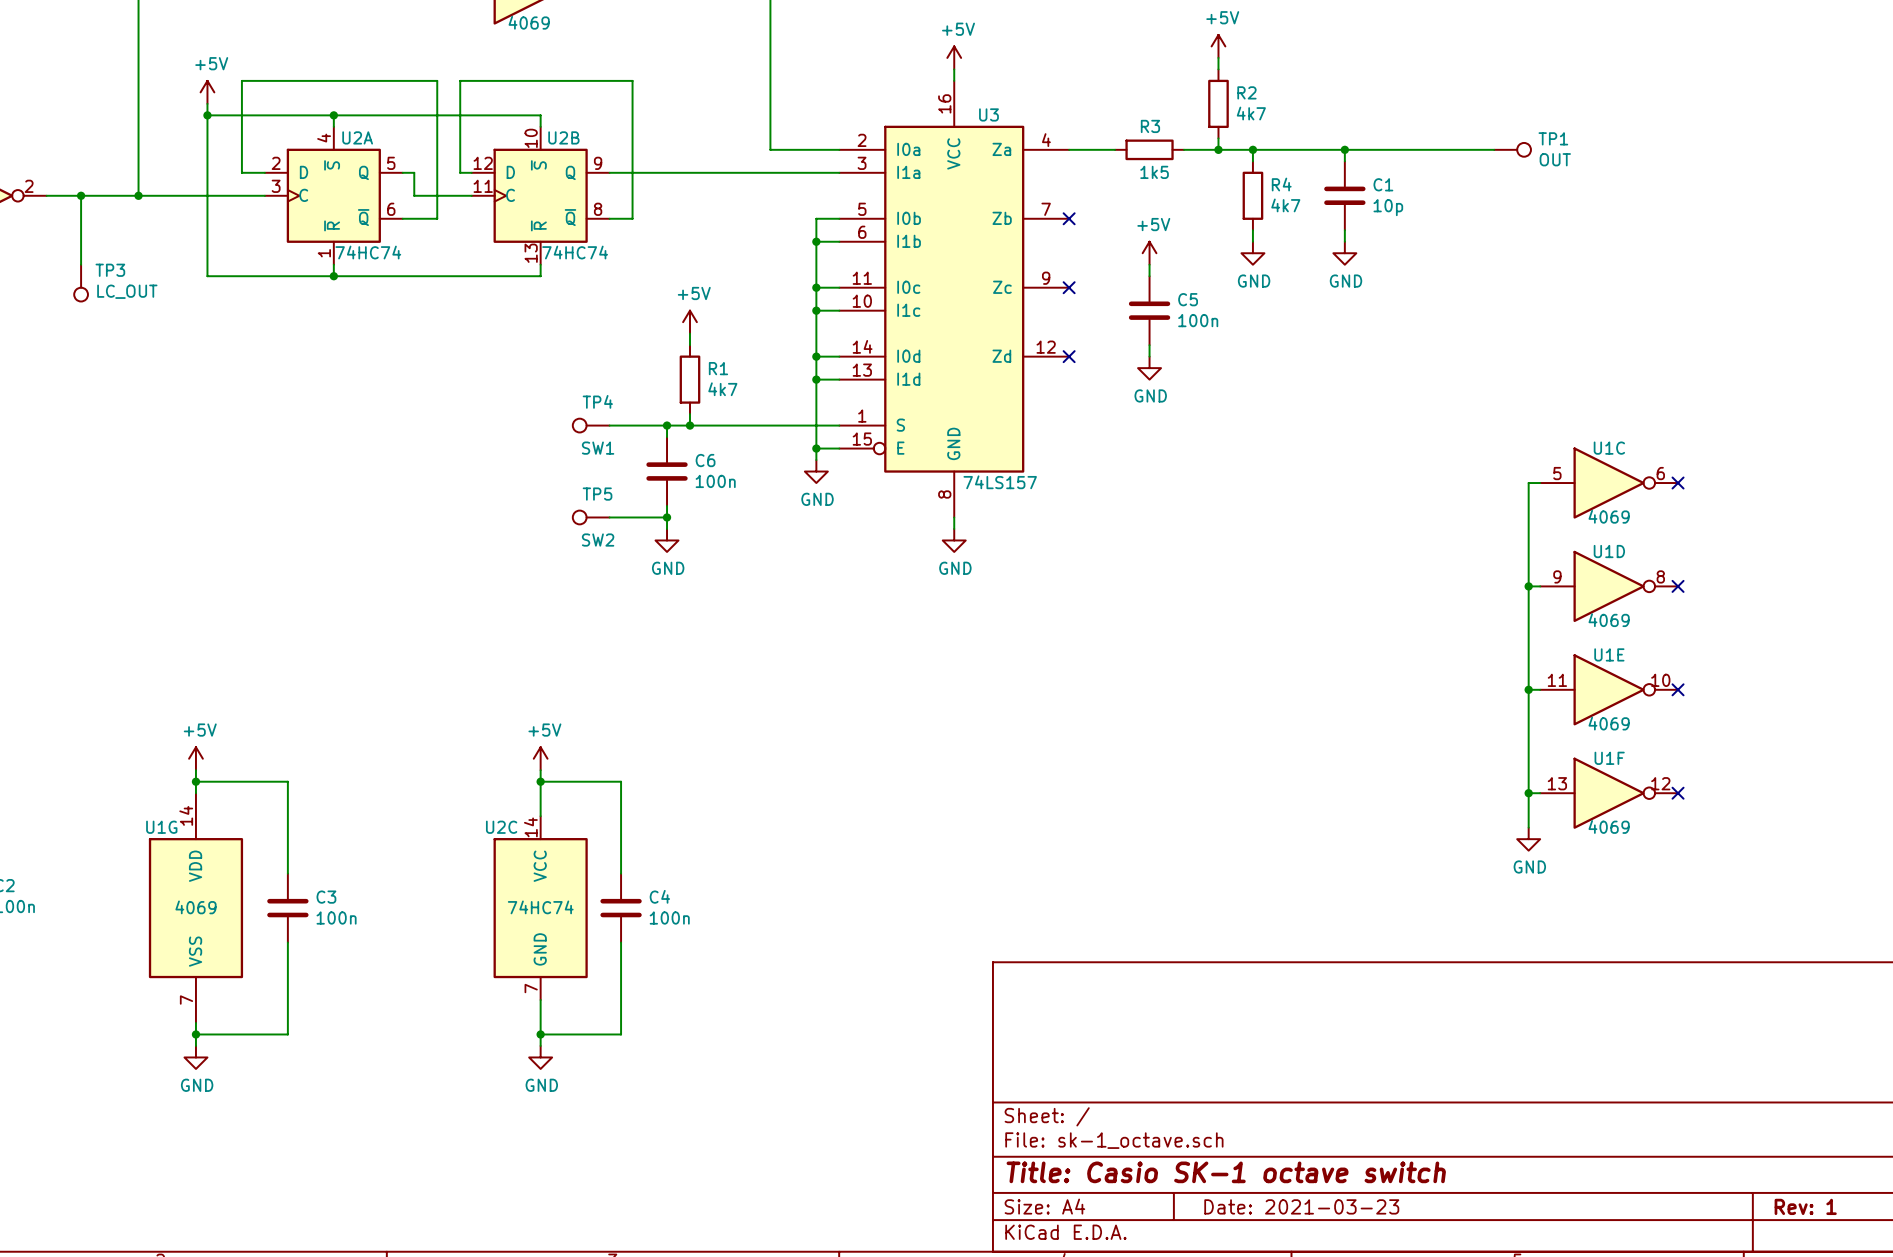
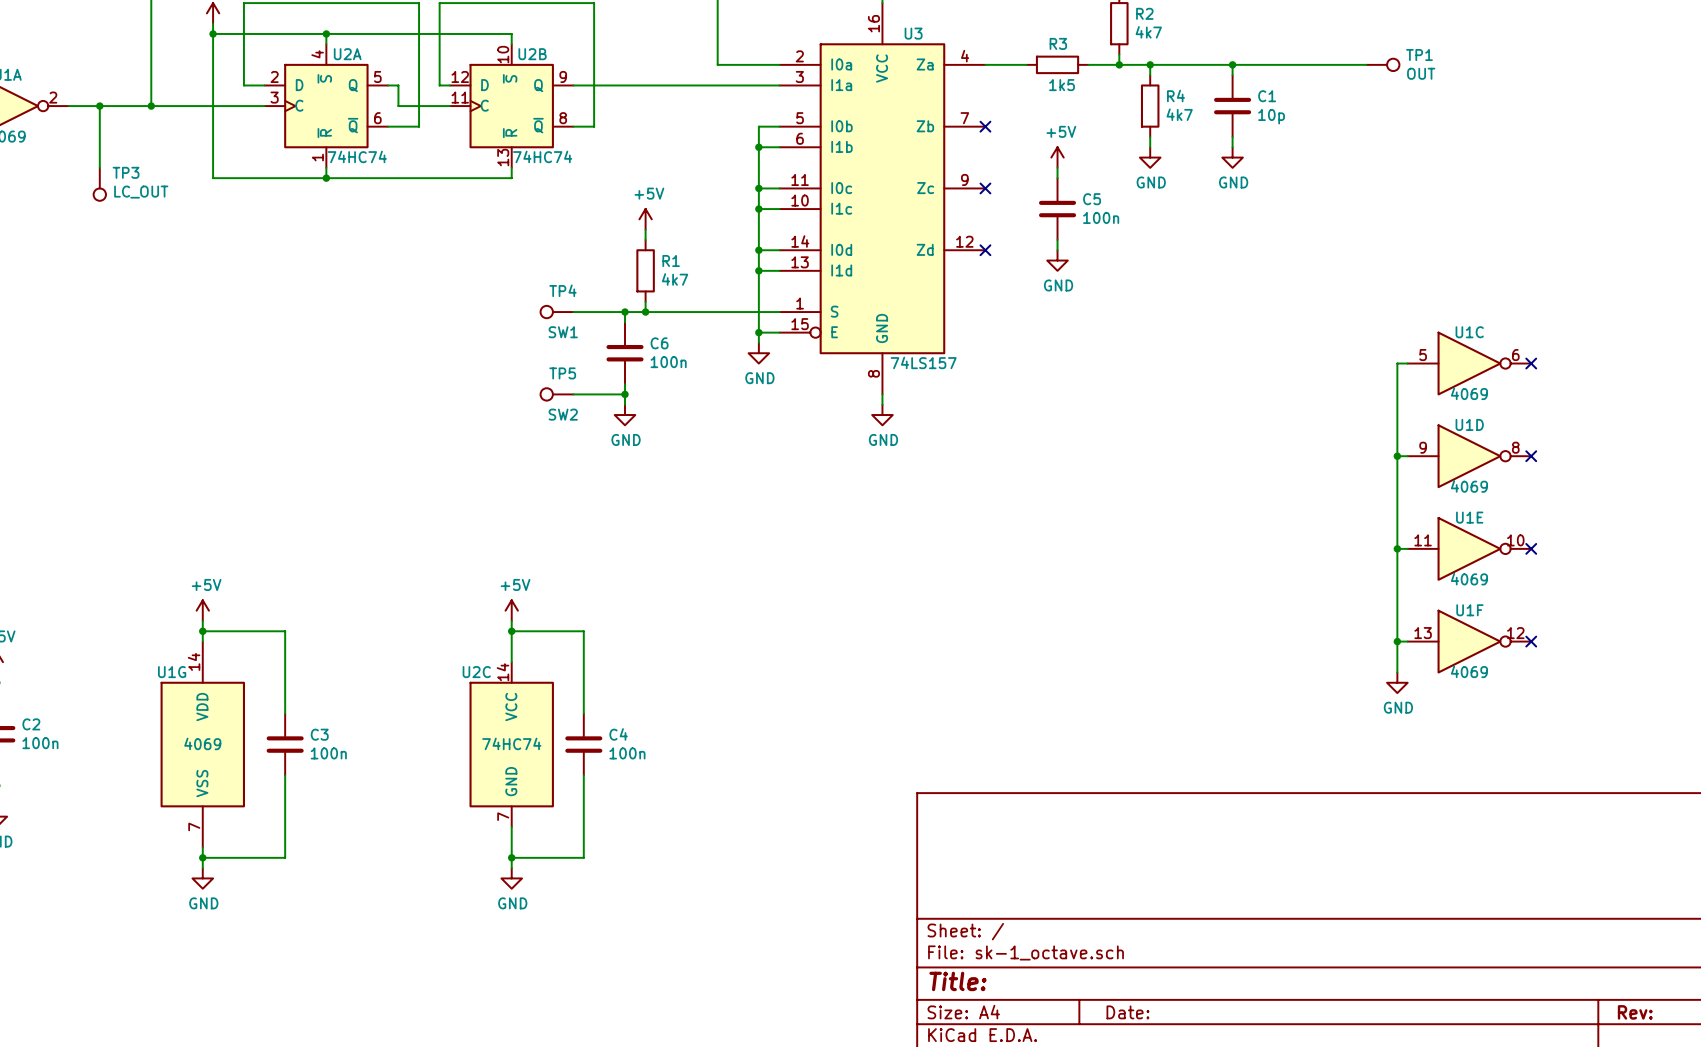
title block: Title: Casio SK-1 octave switch (1226, 1172) -> Title: (957, 981)
title block: Date: 2021-03-23 (1301, 1206) -> Date: (1127, 1012)
title block: Rev: 1 (1805, 1206) -> Rev: (1635, 1012)

